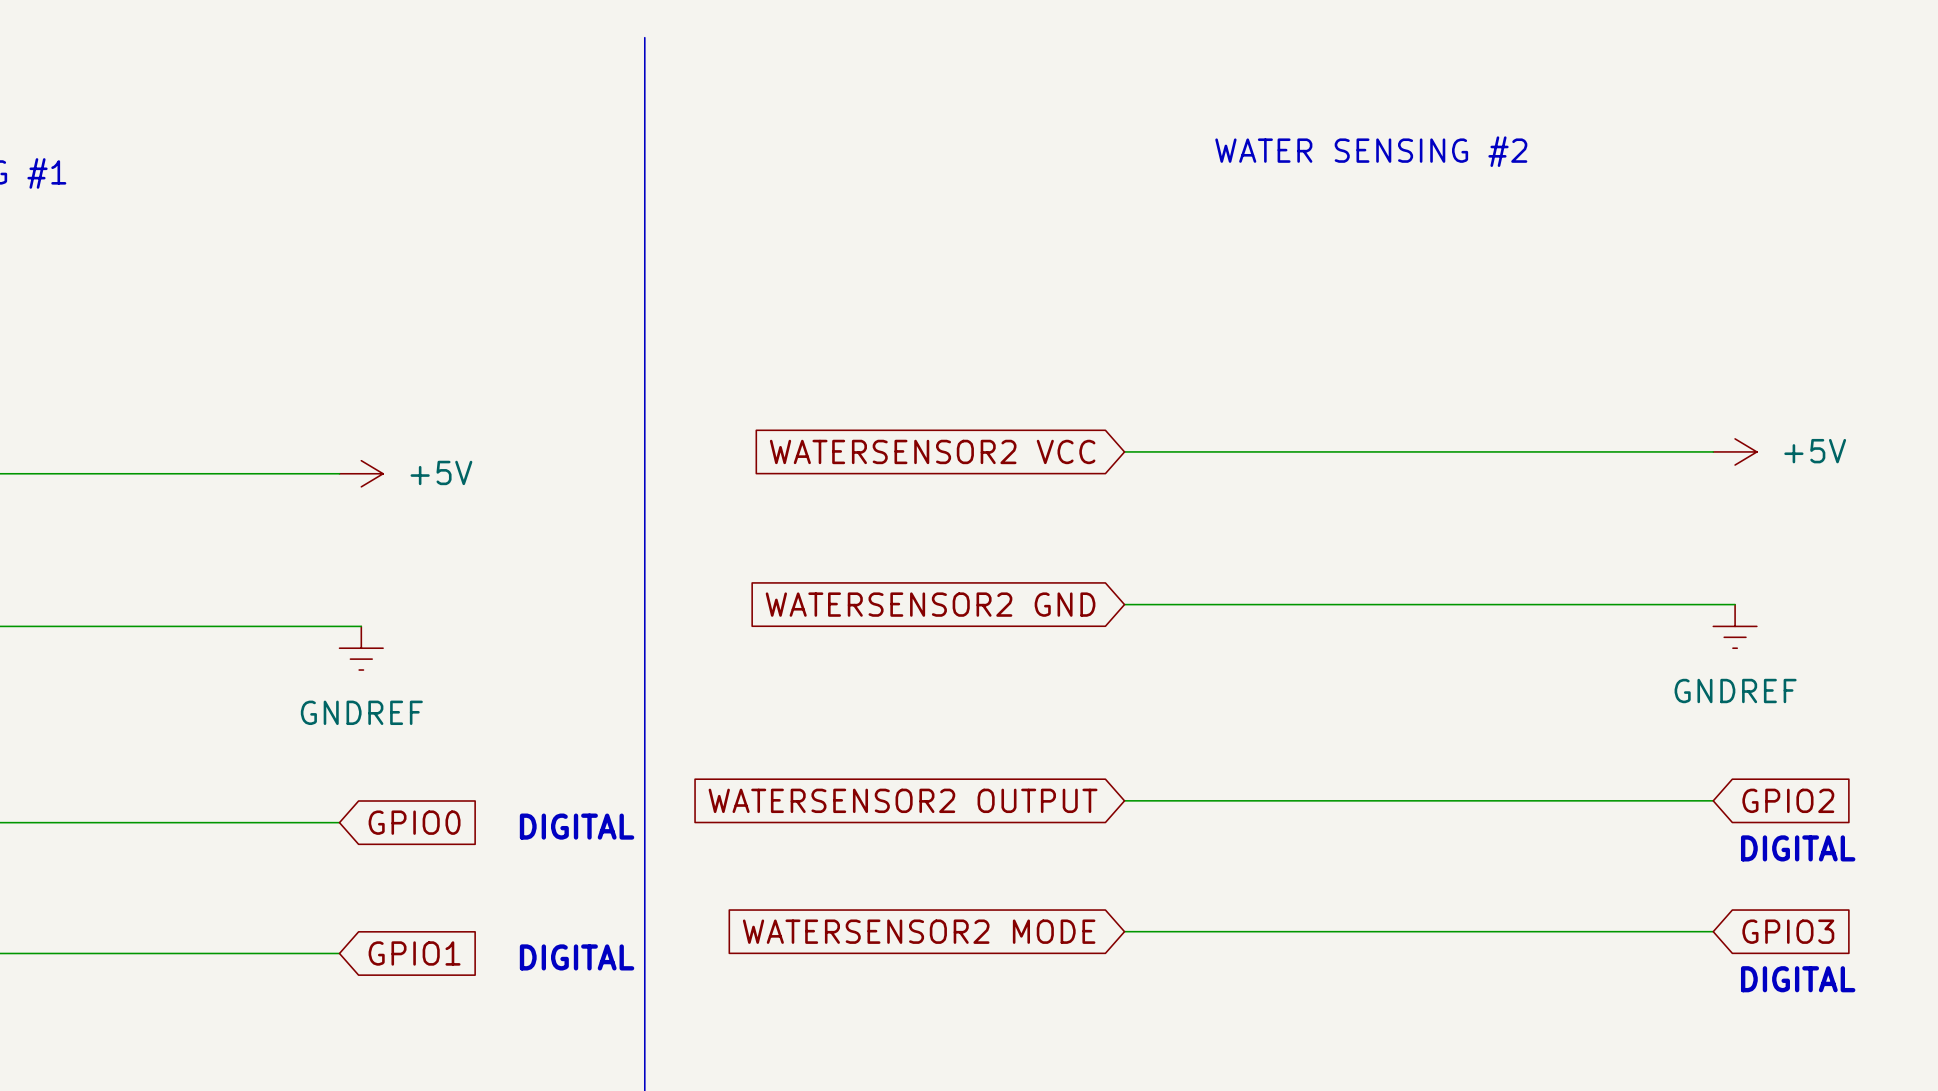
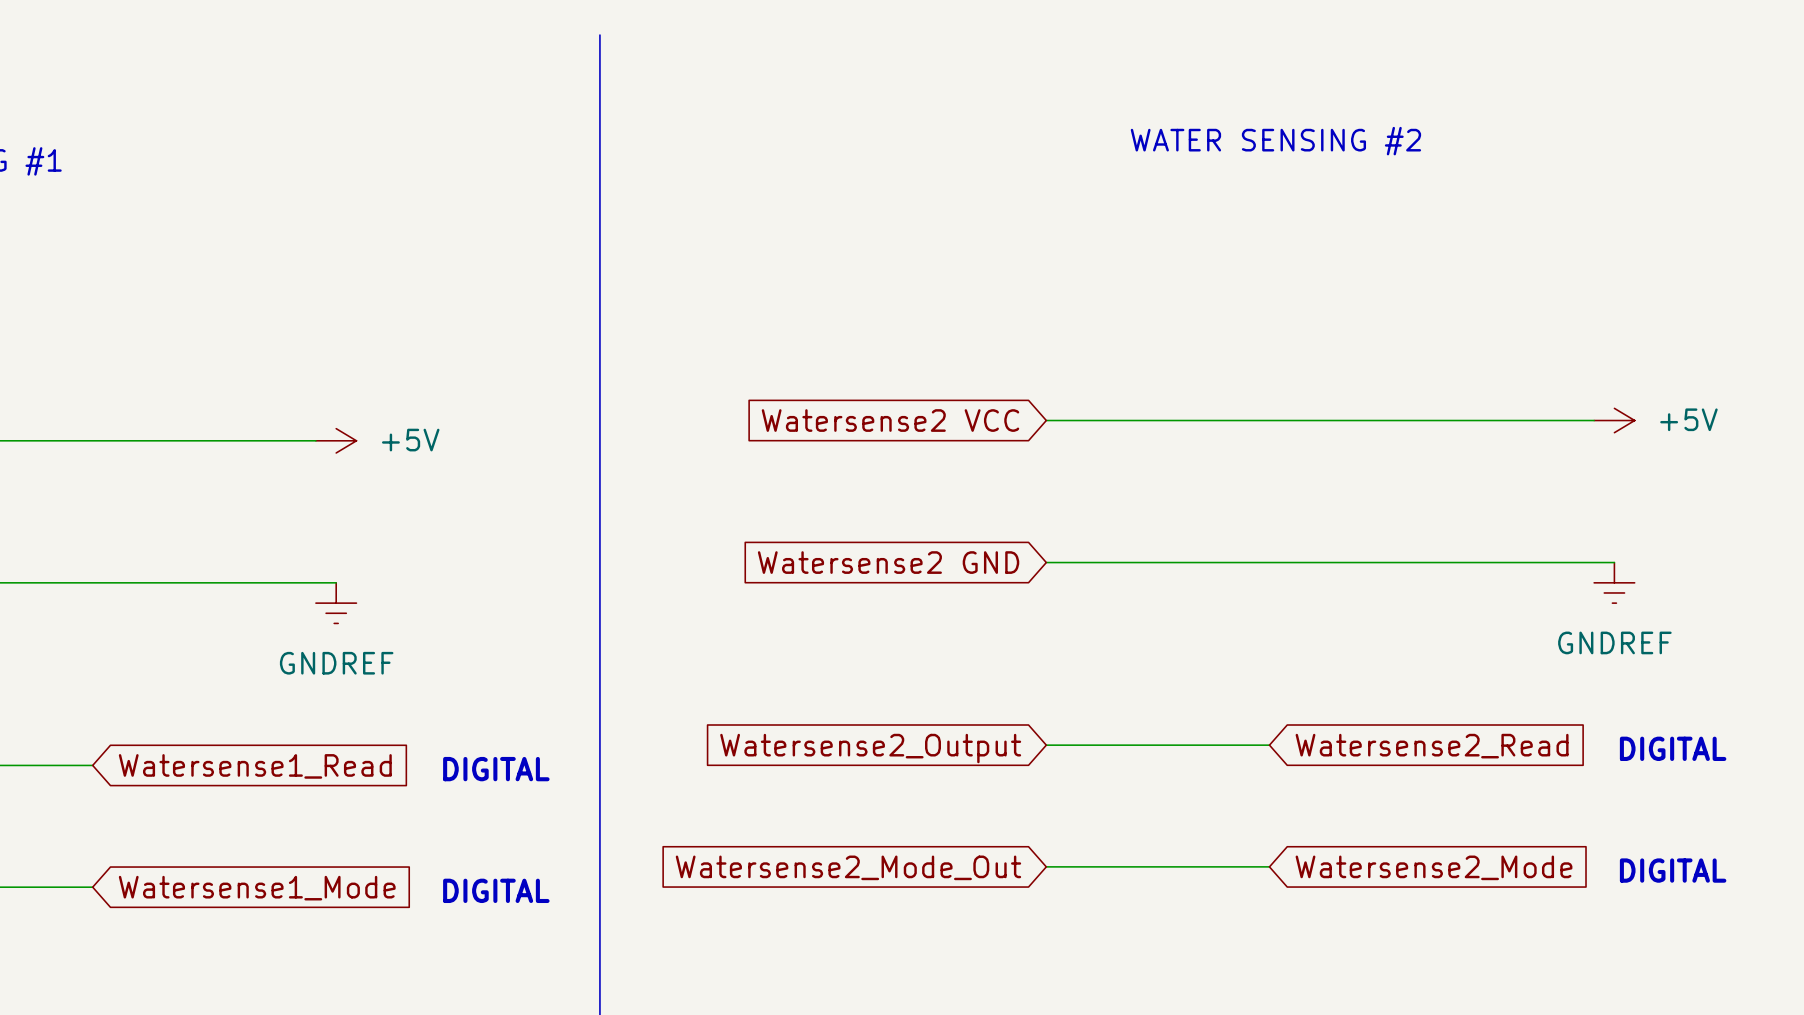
global label: WATERSENSOR2 VCC (932, 451) -> Watersense2 VCC (890, 420)
global label: WATERSENSOR2 GND (930, 604) -> Watersense2 GND (888, 562)
global label: WATERSENSOR2 OUTPUT (903, 800) -> Watersense2_Output (870, 748)
wire: (1364, 800) (1713, 800) -> none
global label: GPIO2 (1788, 800) -> none
global label: none -> Watersense2_Read (1432, 746)
wire: (99, 822) (339, 822) -> none
global label: GPIO0 (414, 822) -> none
global label: none -> Watersense1_Read (255, 766)
text position: DIGITAL (577, 826) -> DIGITAL (496, 769)
text position: DIGITAL (1798, 848) -> DIGITAL (1673, 748)
global label: WATERSENSOR2 MODE (919, 931) -> Watersense2_Mode_Out (848, 867)
wire: (1364, 931) (1713, 931) -> none
global label: GPIO3 (1788, 931) -> none
global label: none -> Watersense2_Mode (1434, 867)
wire: (99, 953) (339, 953) -> none
global label: GPIO1 (414, 953) -> none
global label: none -> Watersense1_Mode (257, 888)
text position: DIGITAL (577, 957) -> DIGITAL (496, 890)
text position: DIGITAL (1798, 979) -> DIGITAL (1673, 870)

